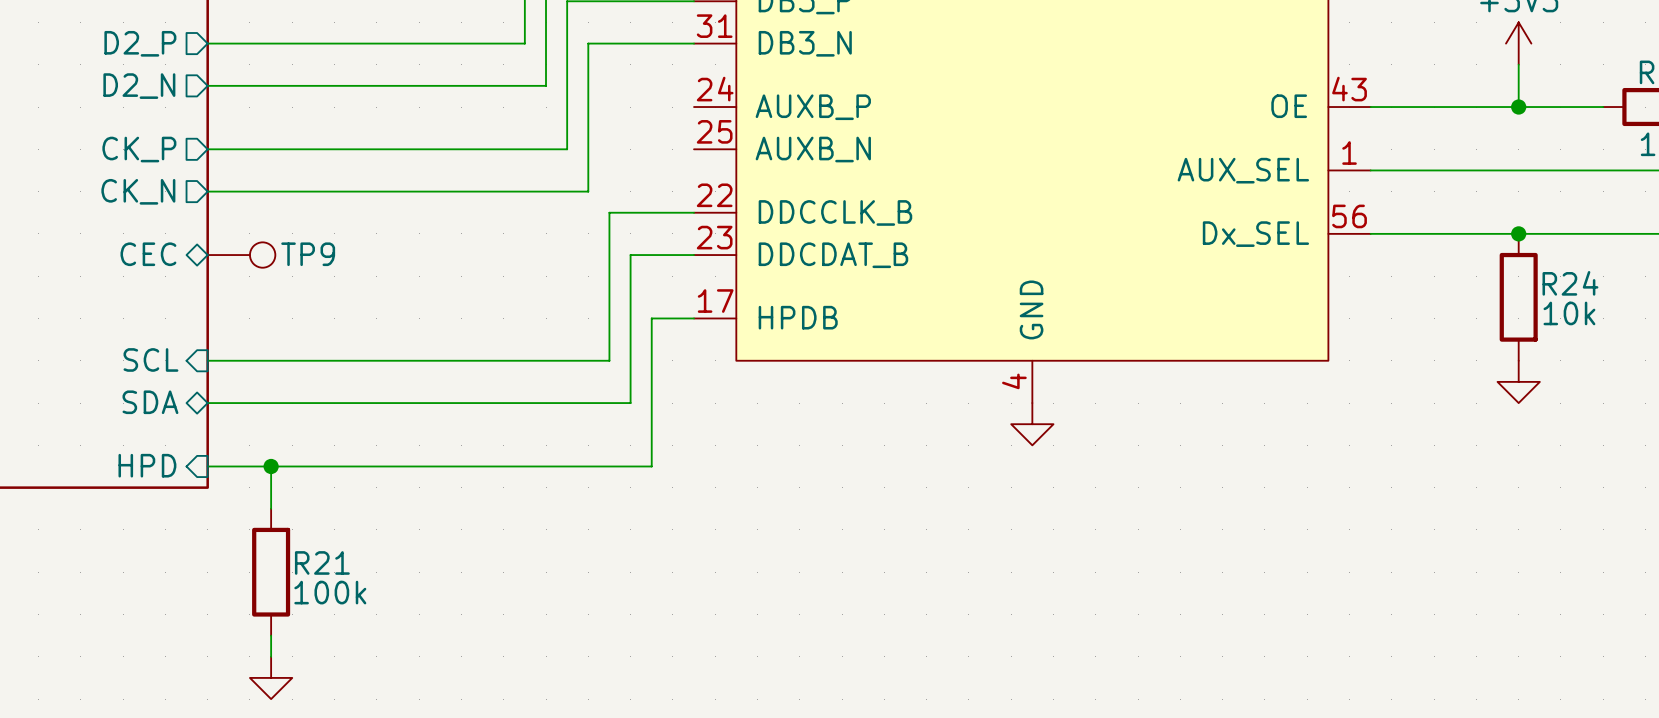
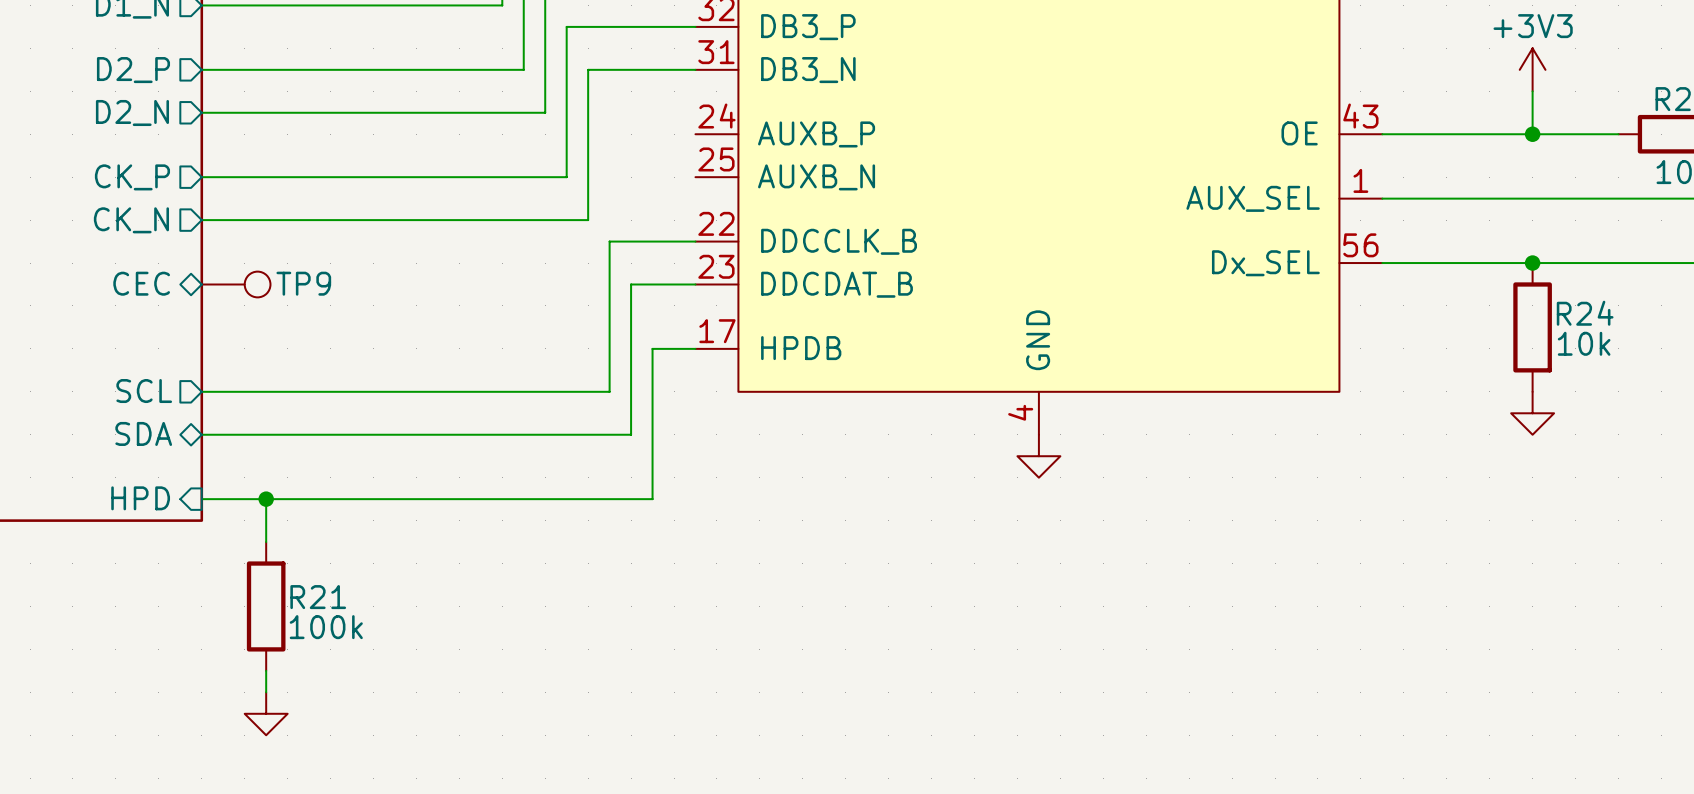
sheet pin shape: input (150, 359) -> output (144, 391)

